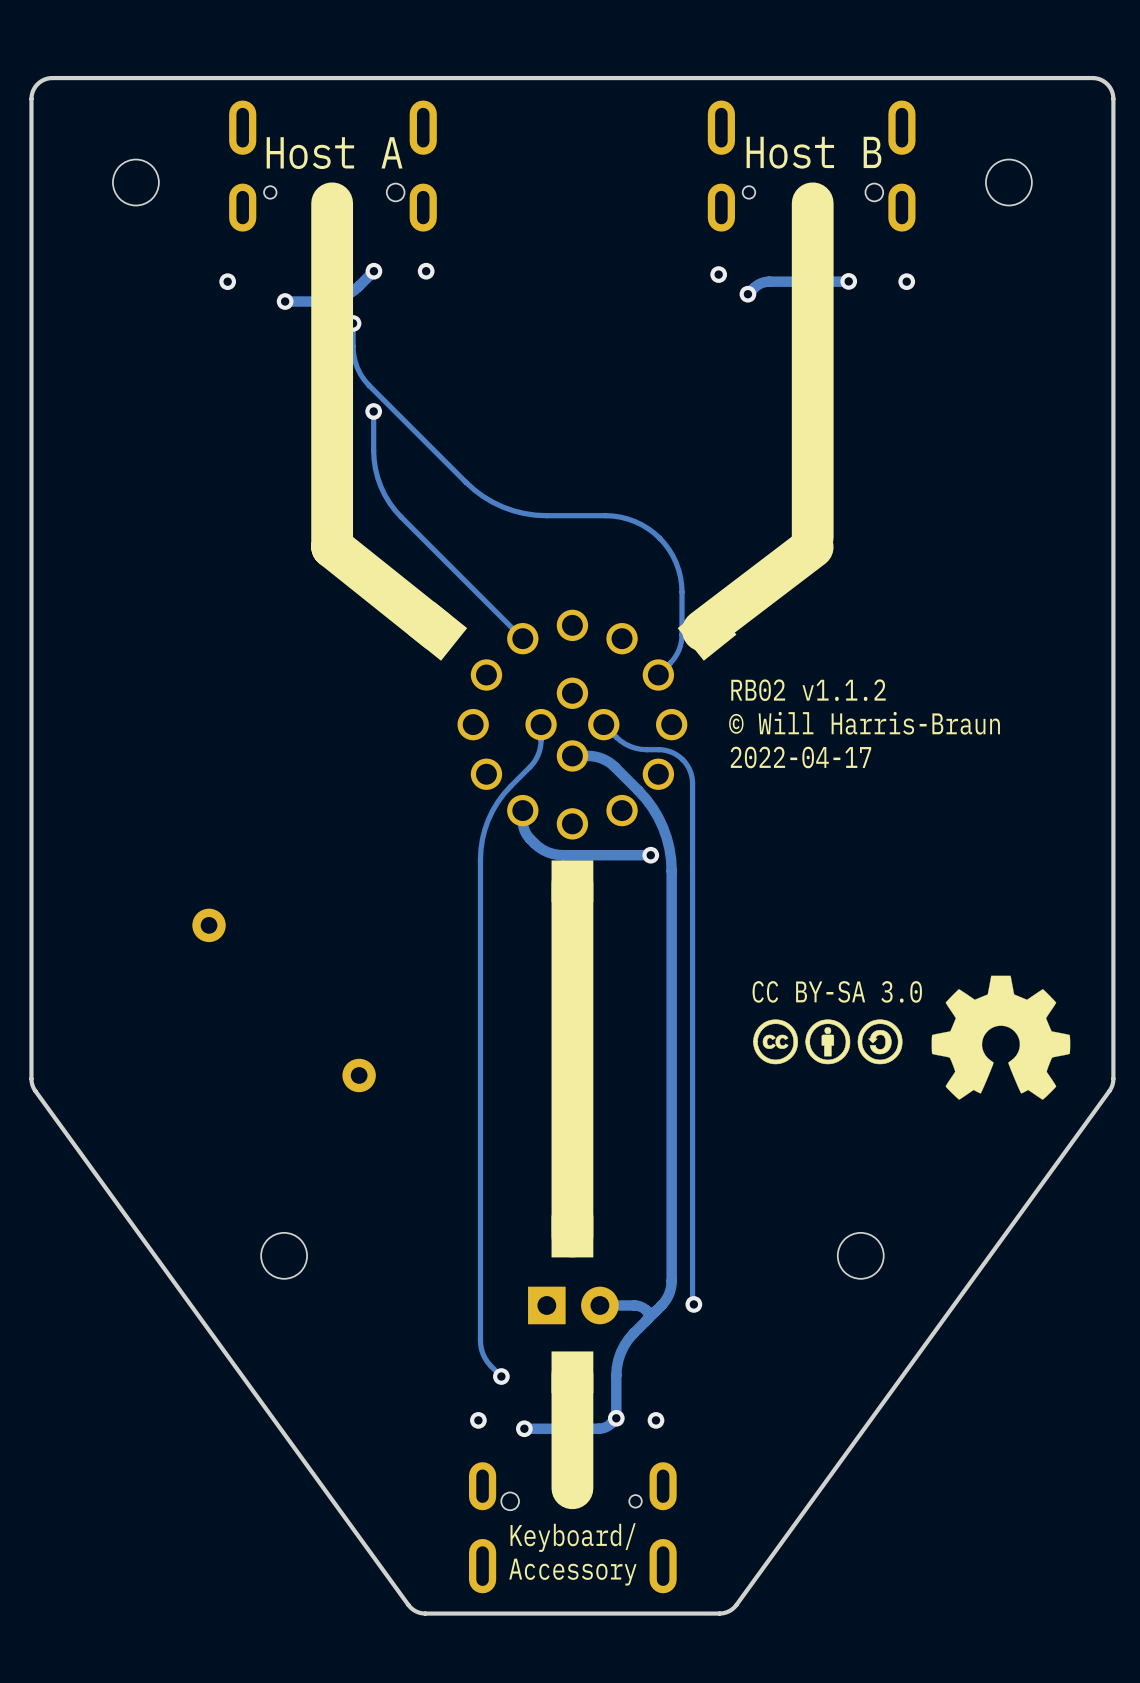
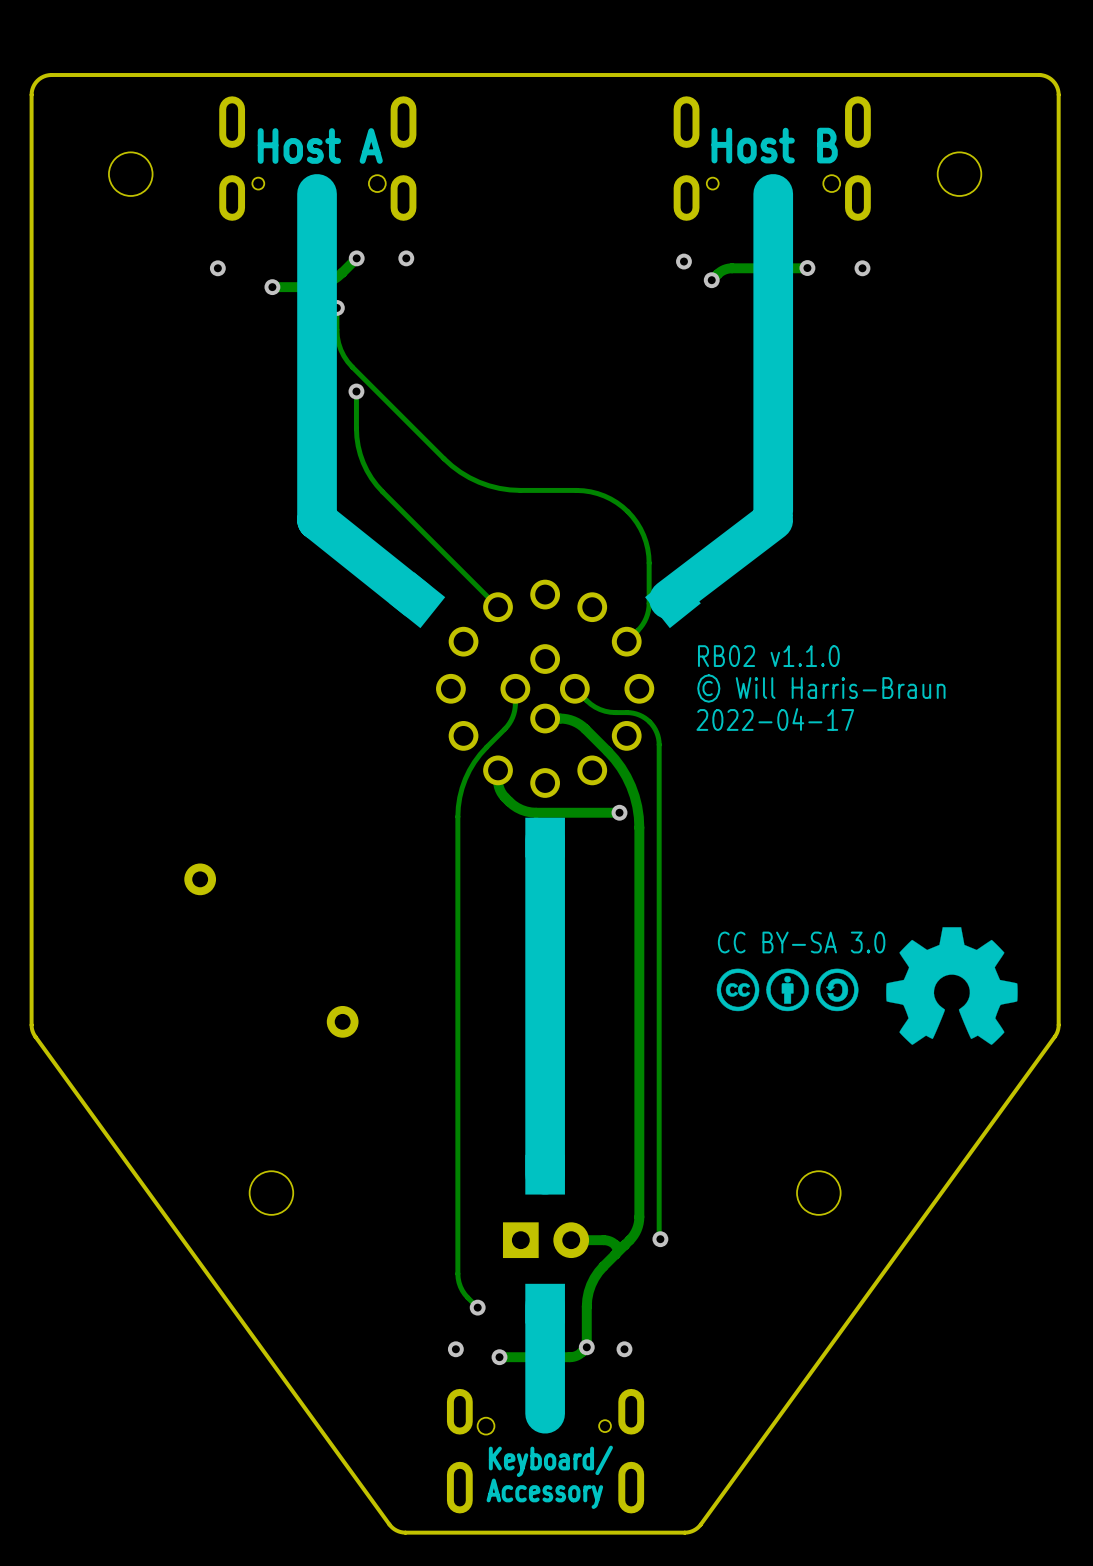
text: RB02 v1.1.2 (808, 690) -> RB02 v1.1.0 (768, 656)

